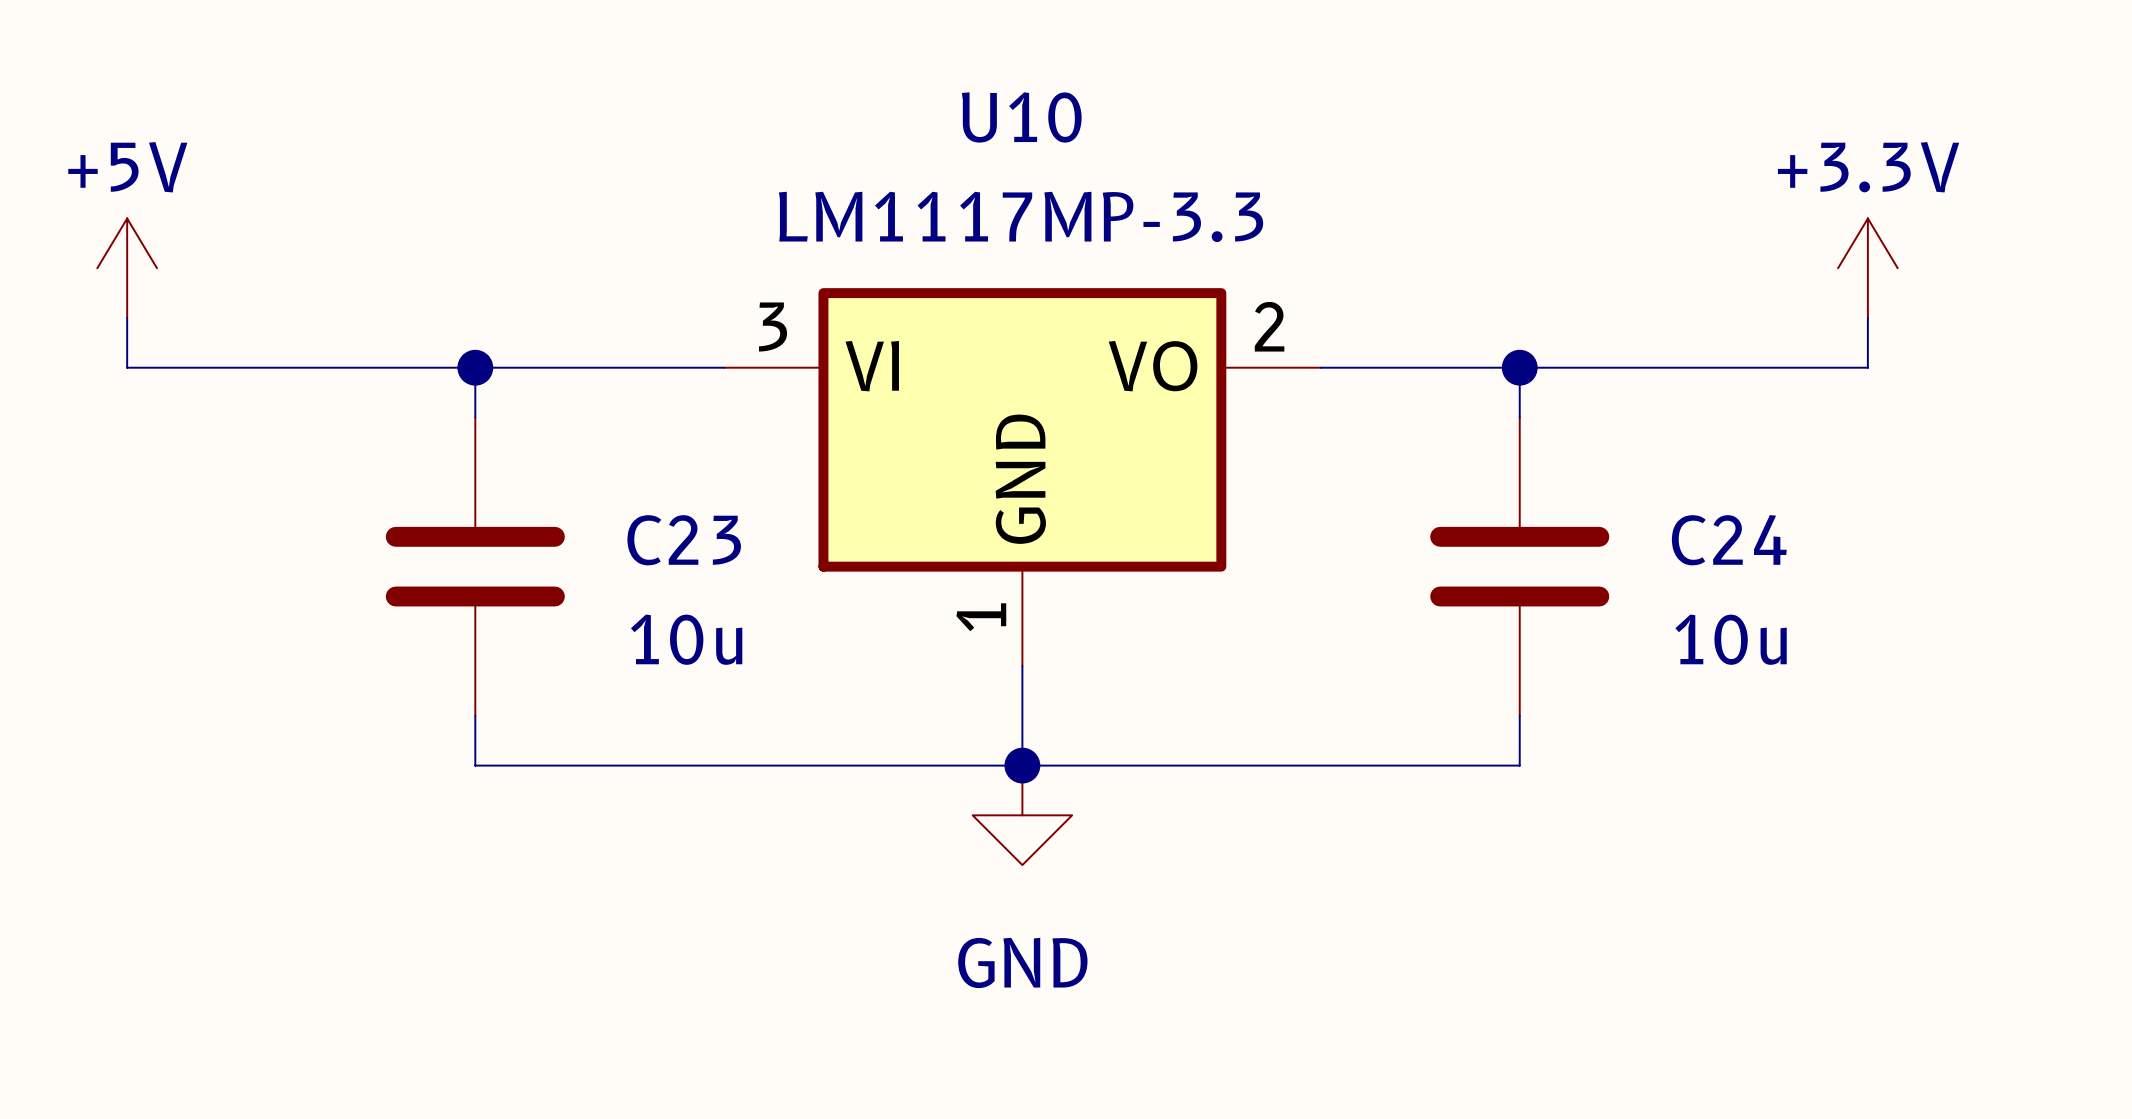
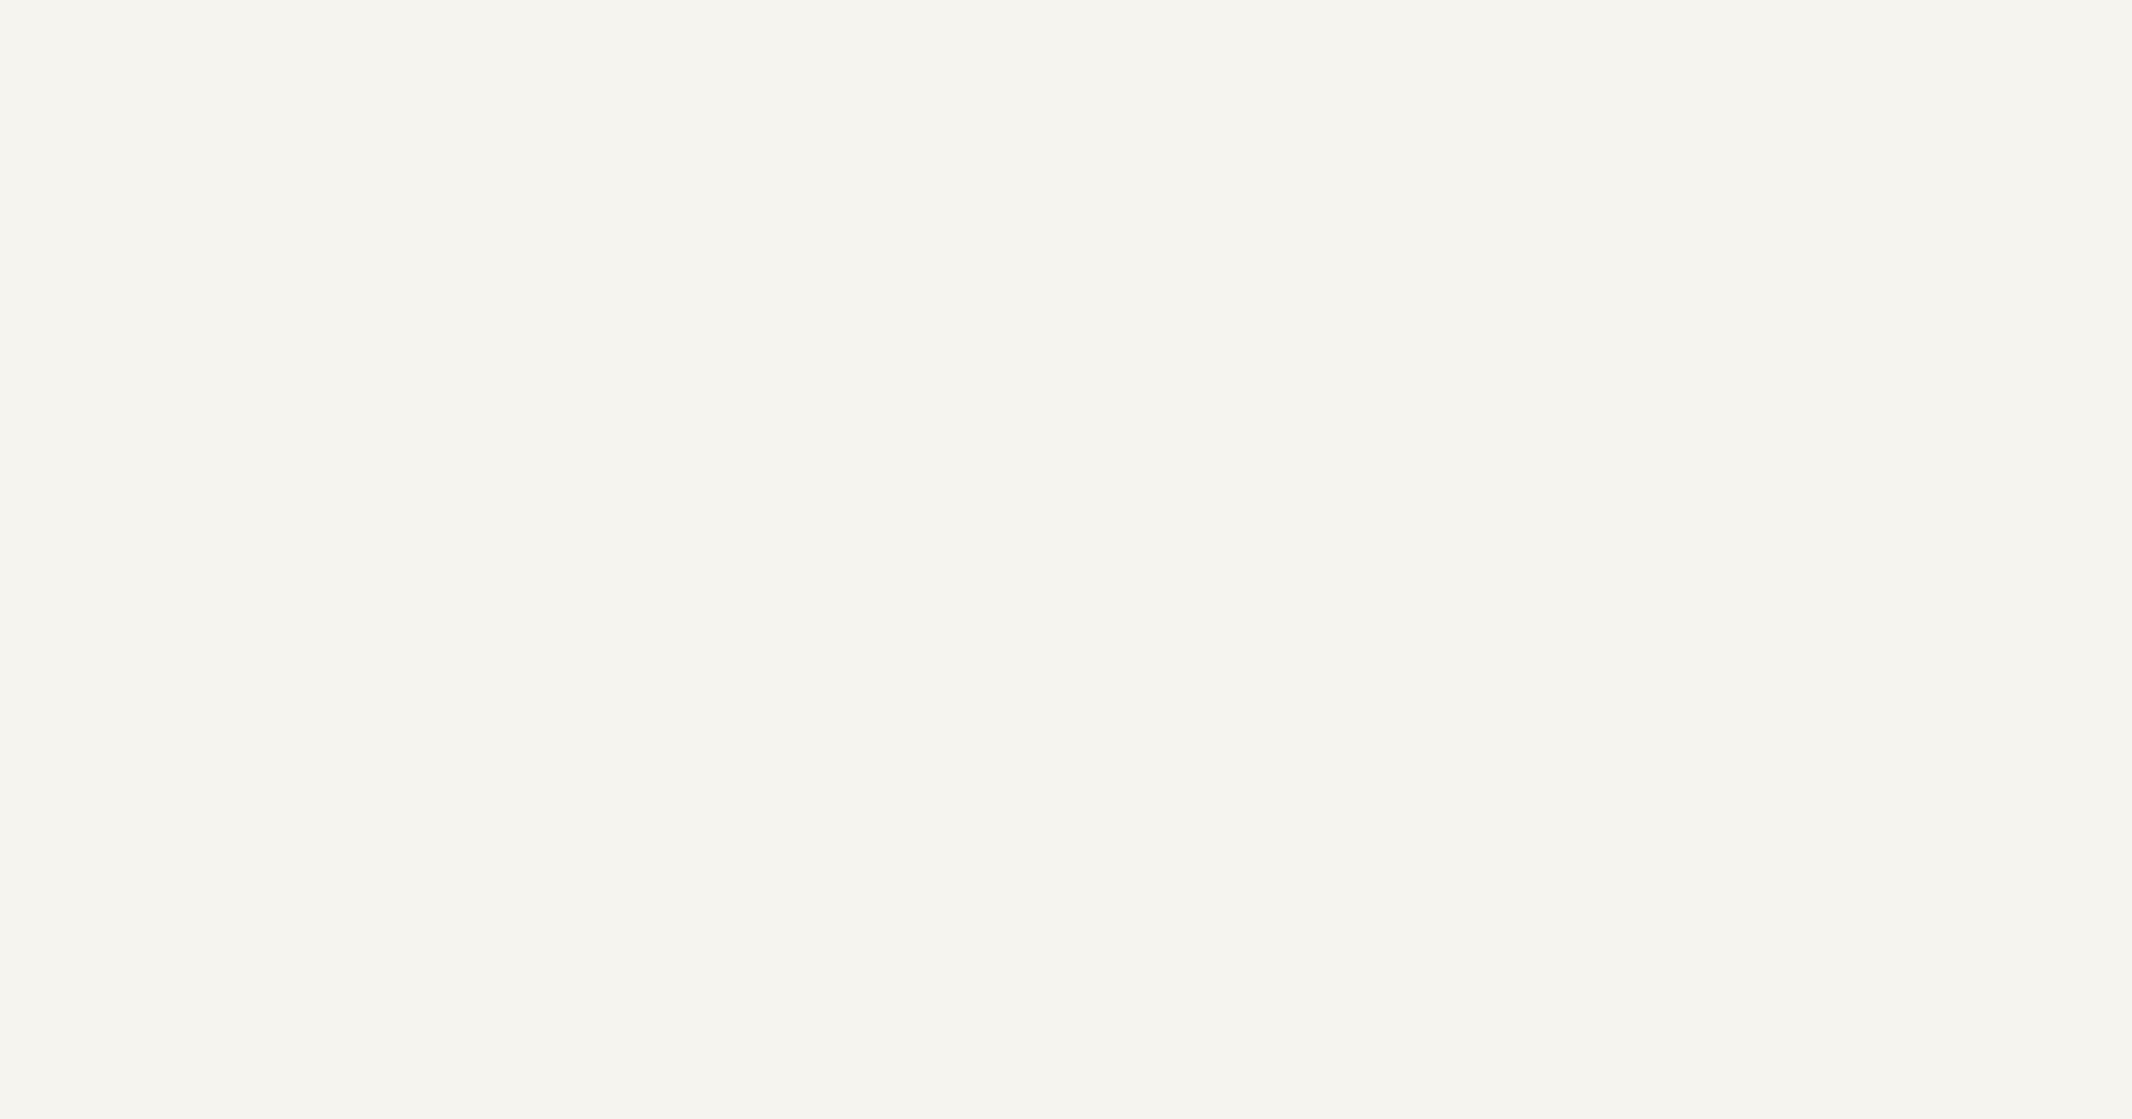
power symbol: +5V (127, 268) -> none
power symbol: +3.3V (1867, 268) -> none
wire: (127, 317) (127, 367) (723, 367) -> none
wire: (1867, 317) (1867, 367) (1320, 367) -> none
wire: (475, 367) (475, 417) -> none
junction: (475, 367) -> none
wire: (1519, 367) (1519, 417) -> none
junction: (1519, 367) -> none
U10: LM1117MP-3.3 (1022, 477) -> none
C23: 10u (475, 566) -> none
C24: 10u (1519, 566) -> none
wire: (1022, 666) (1022, 765) -> none
wire: (475, 715) (475, 765) (1519, 765) (1519, 715) -> none
junction: (1022, 765) -> none
power symbol: GND (1022, 815) -> none

